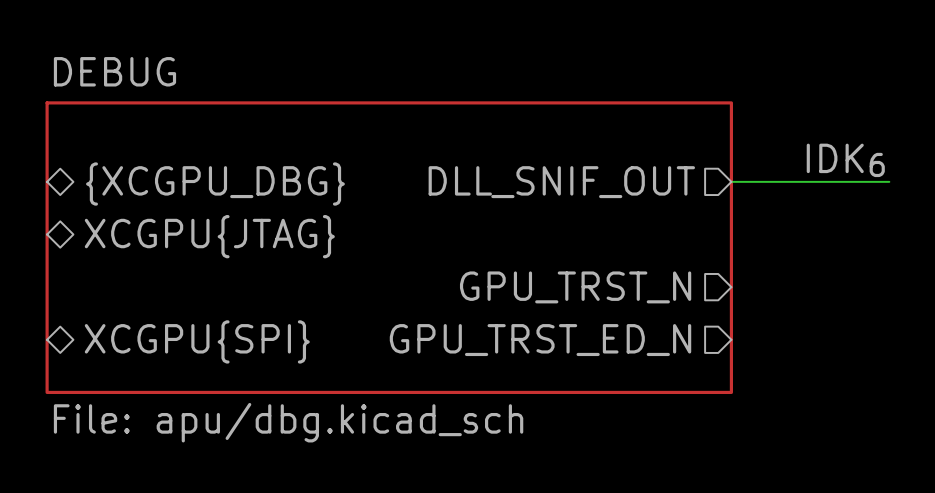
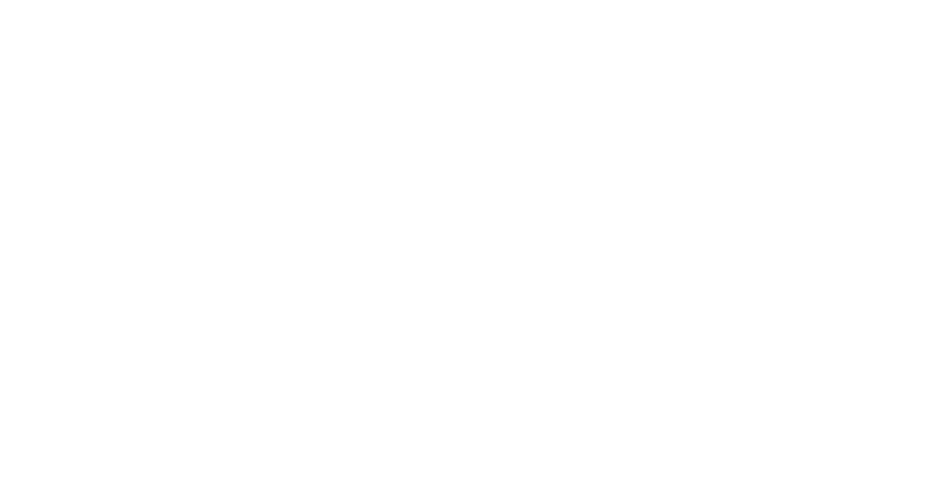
label: IDK6 (845, 160) -> none
wire: (731, 181) (889, 181) -> none
sheet pin: DLL_SNIF_OUT (561, 182) -> none
sheet pin: {XCGPU_DBG} (215, 184) -> none
sheet pin: XCGPU{JTAG} (209, 236) -> none
sheet DEBUG: File: apu/dbg.kicad_sch (389, 247) -> none
sheet pin: GPU_TRST_N (575, 287) -> none
sheet pin: GPU_TRST_ED_N (540, 340) -> none
sheet pin: XCGPU{SPI} (197, 341) -> none

